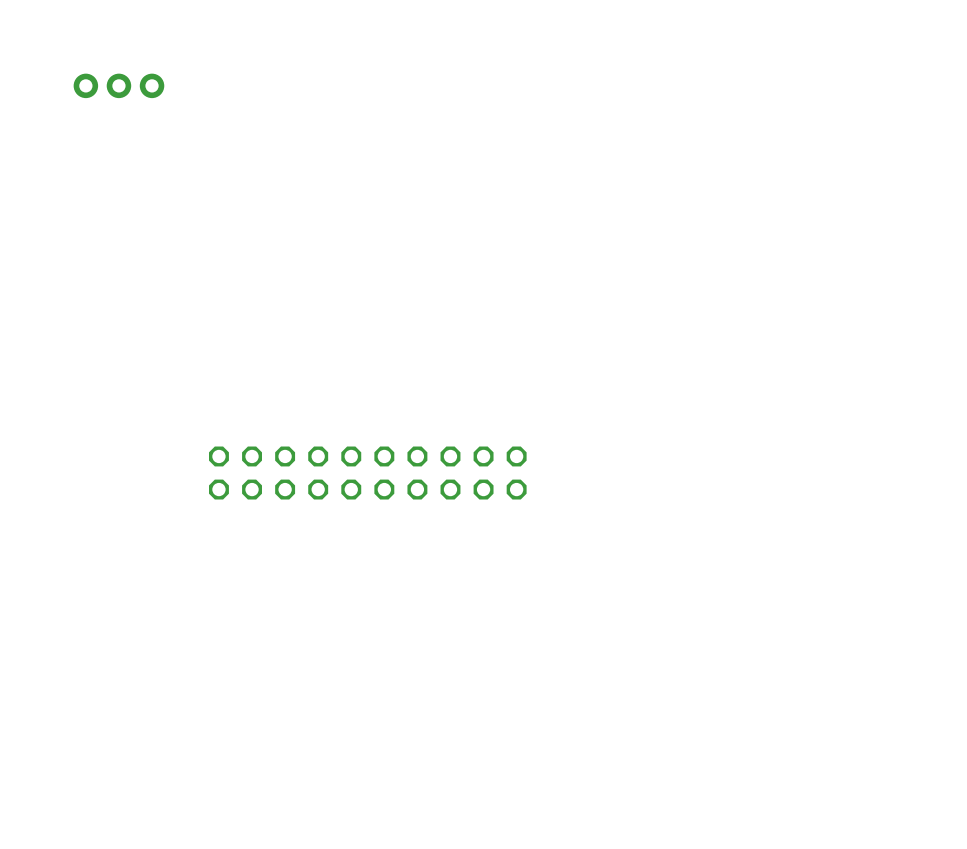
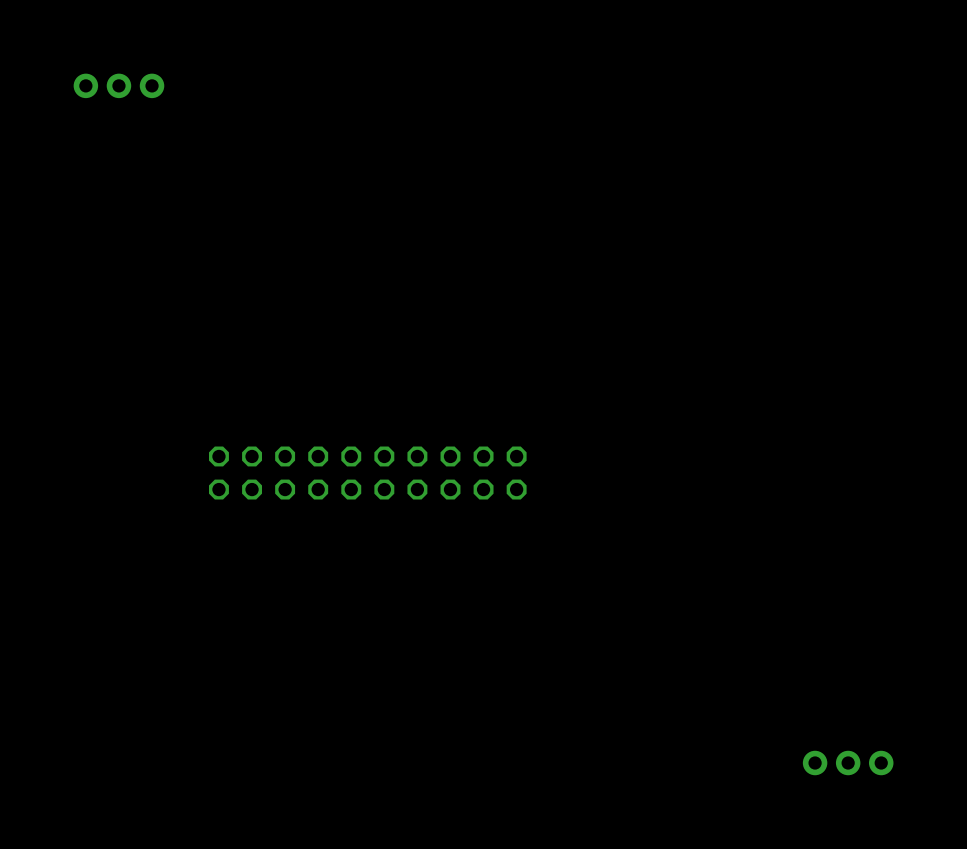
part: none -> (848, 763)

